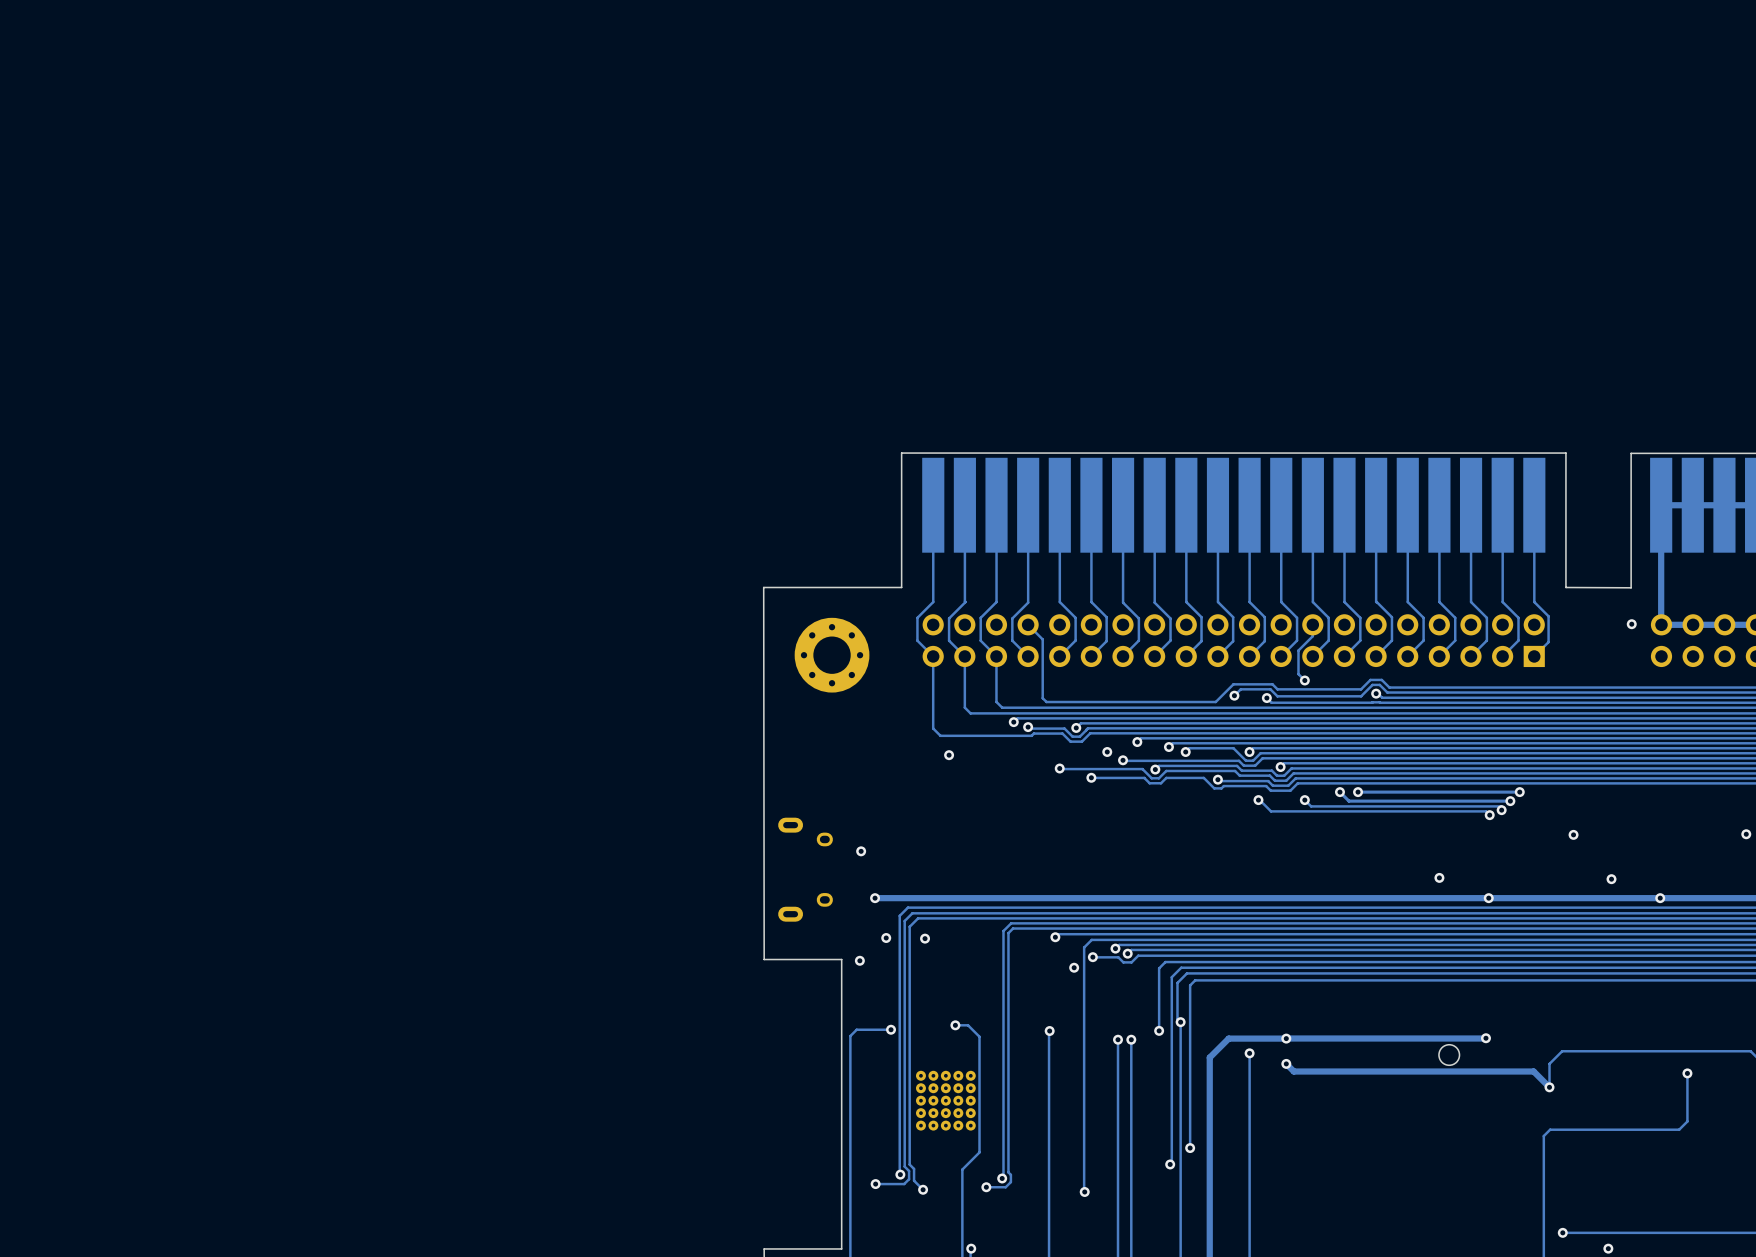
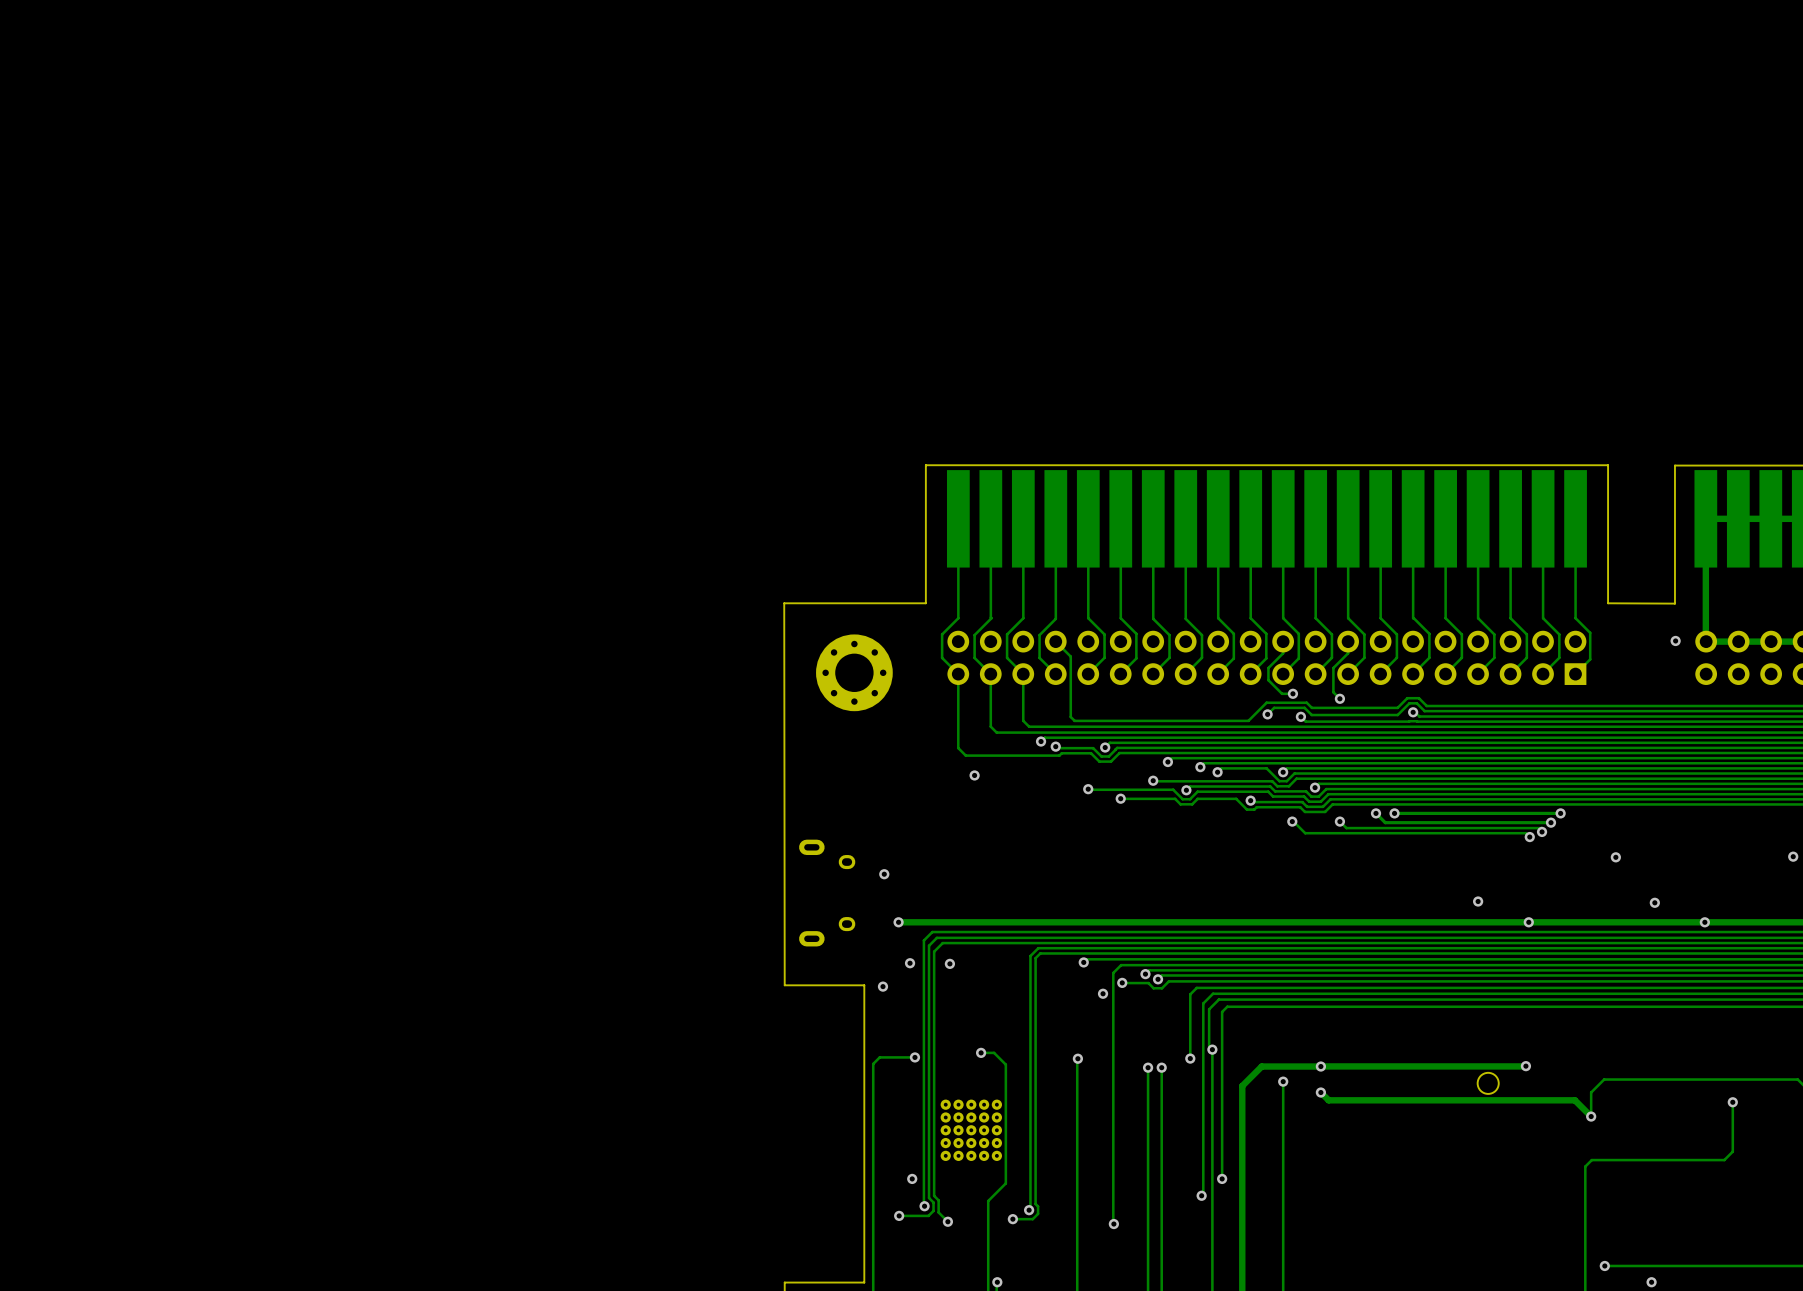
track: none -> (1283, 641) (1283, 653) (1268, 668) (1268, 680) (1282, 693) (1292, 693)
via: none -> (1292, 693)
via: (1107, 751) -> none
via: none -> (912, 1178)

